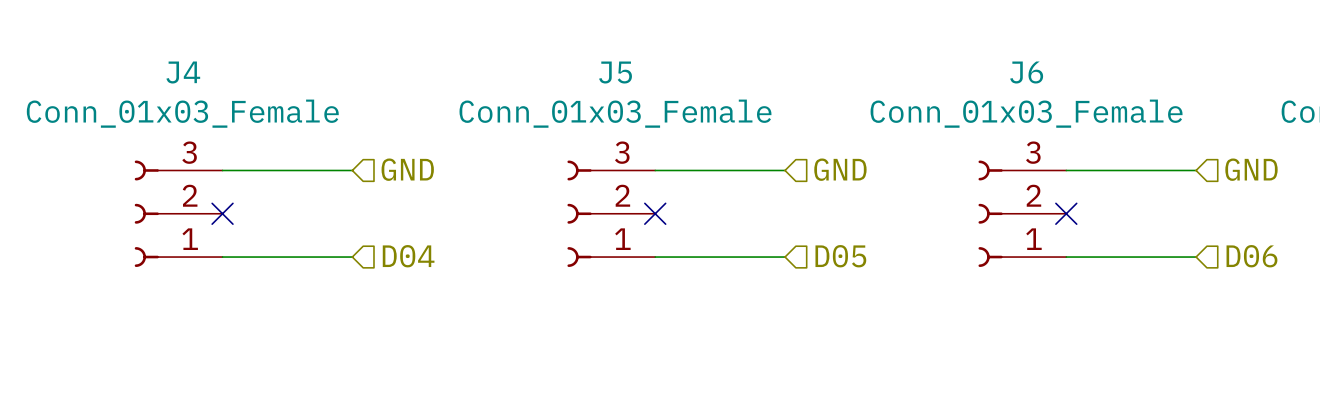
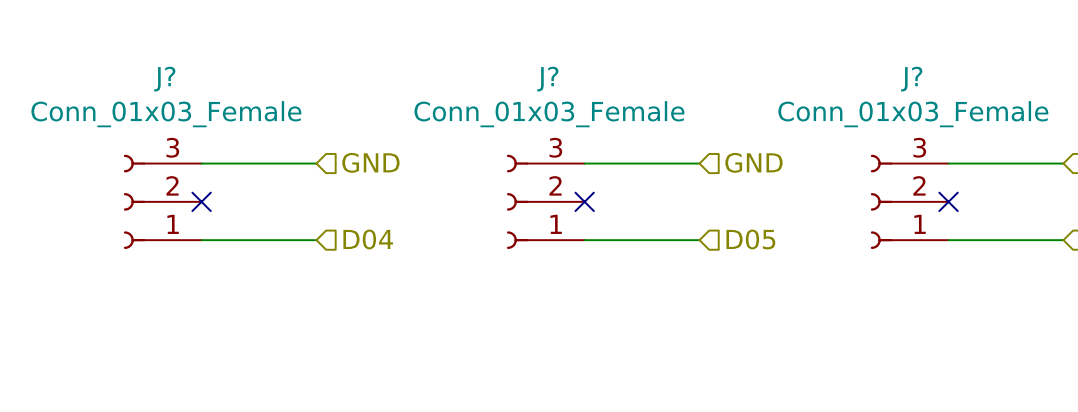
J4 name: J4 (183, 72) -> J? (164, 79)
J5 name: J5 (615, 72) -> J? (547, 79)
J6 name: J6 (1026, 72) -> J? (911, 79)

